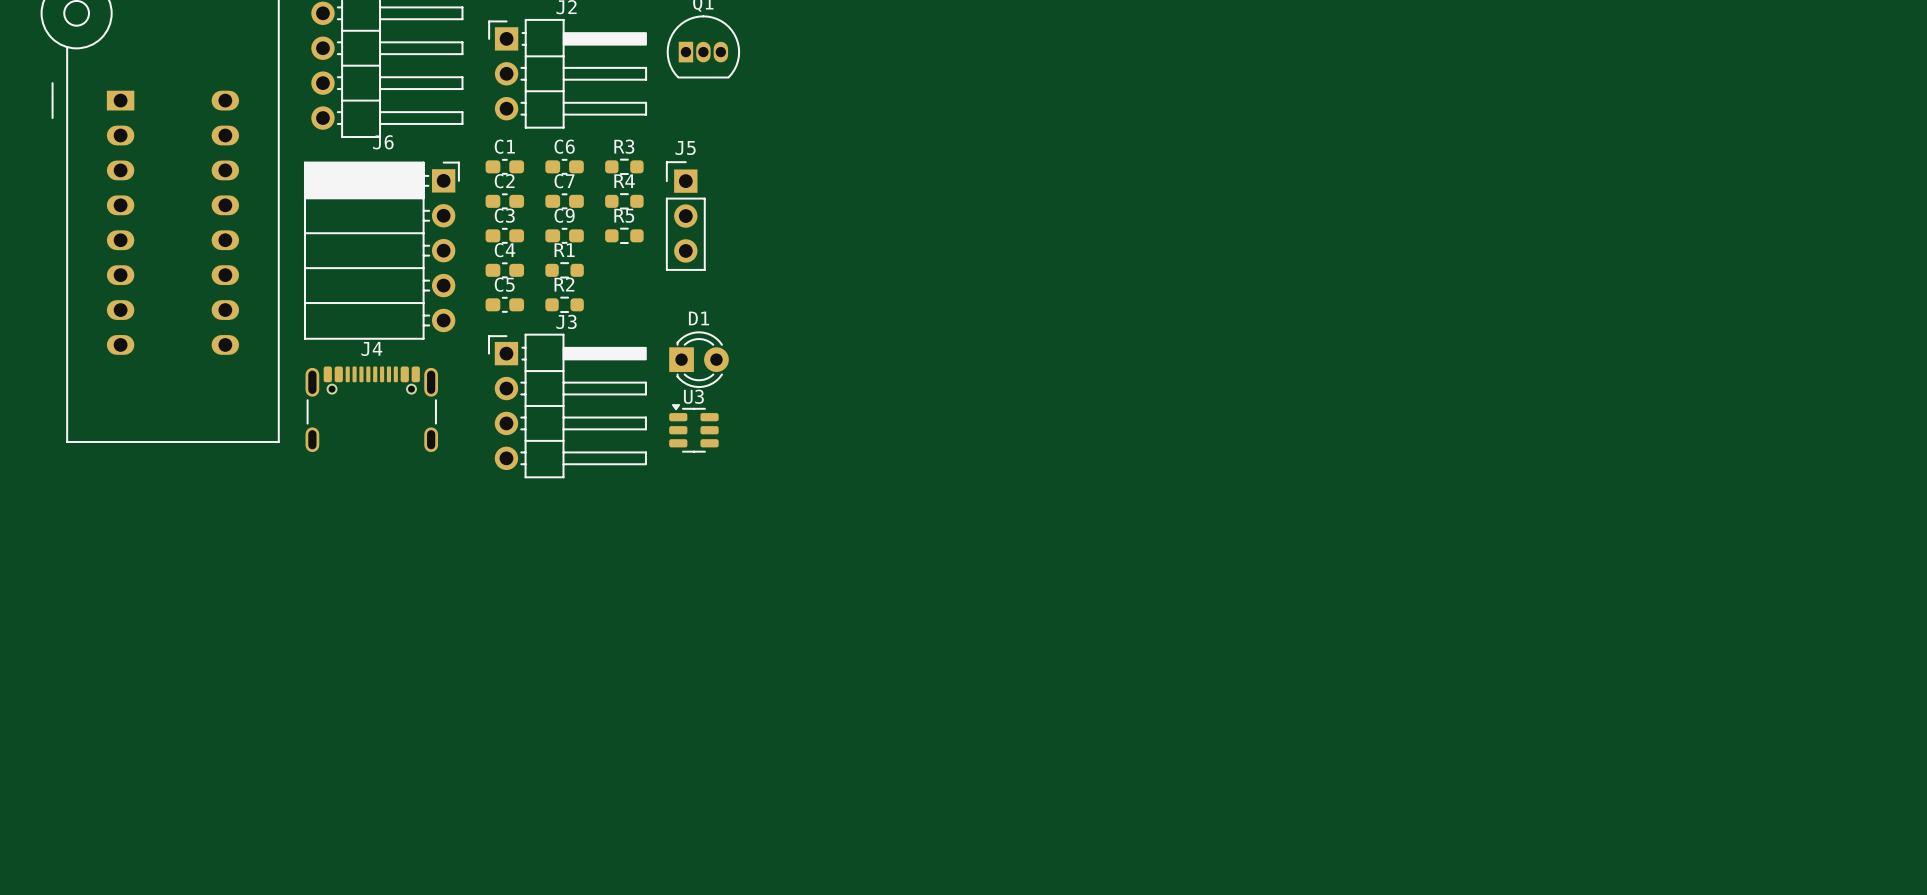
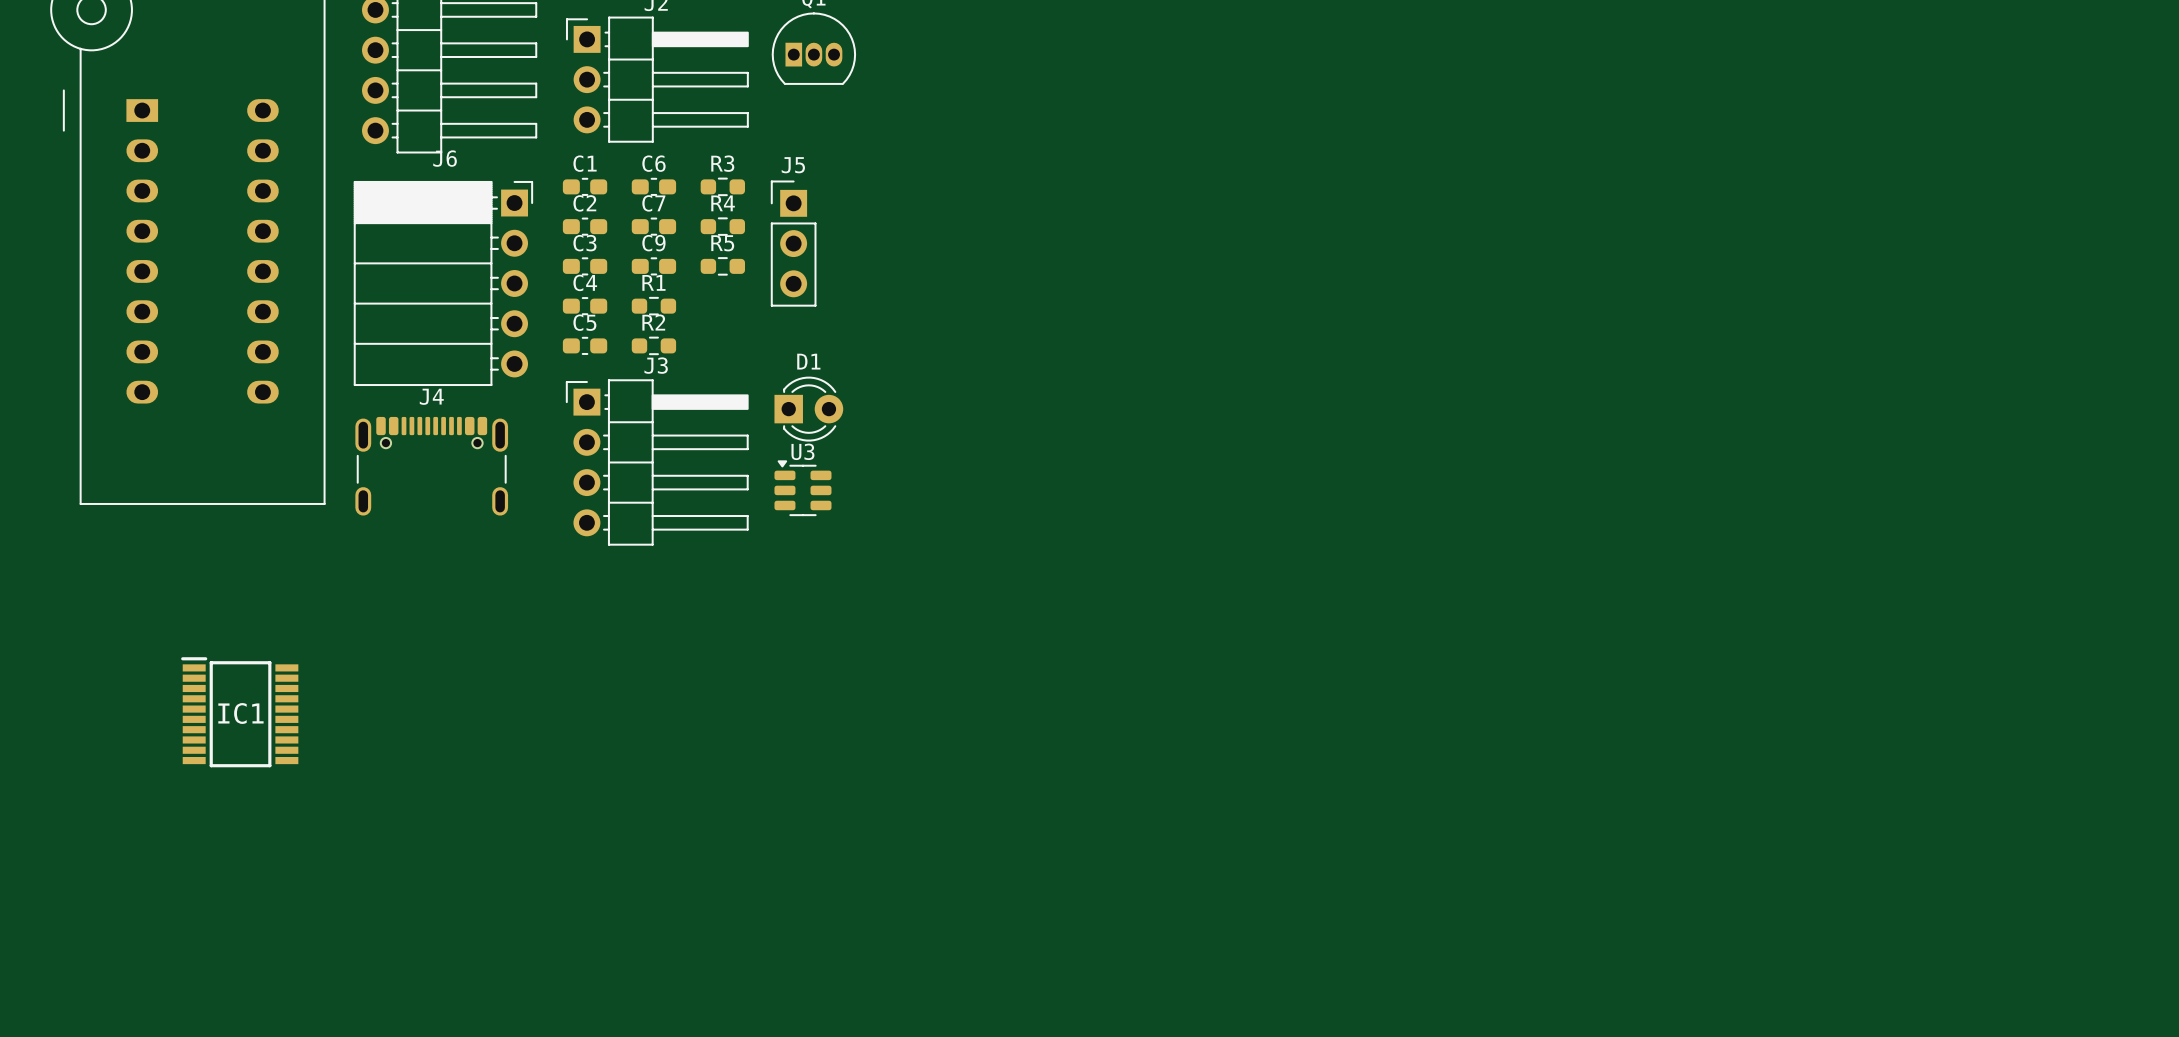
IC1: none -> (239, 712)

